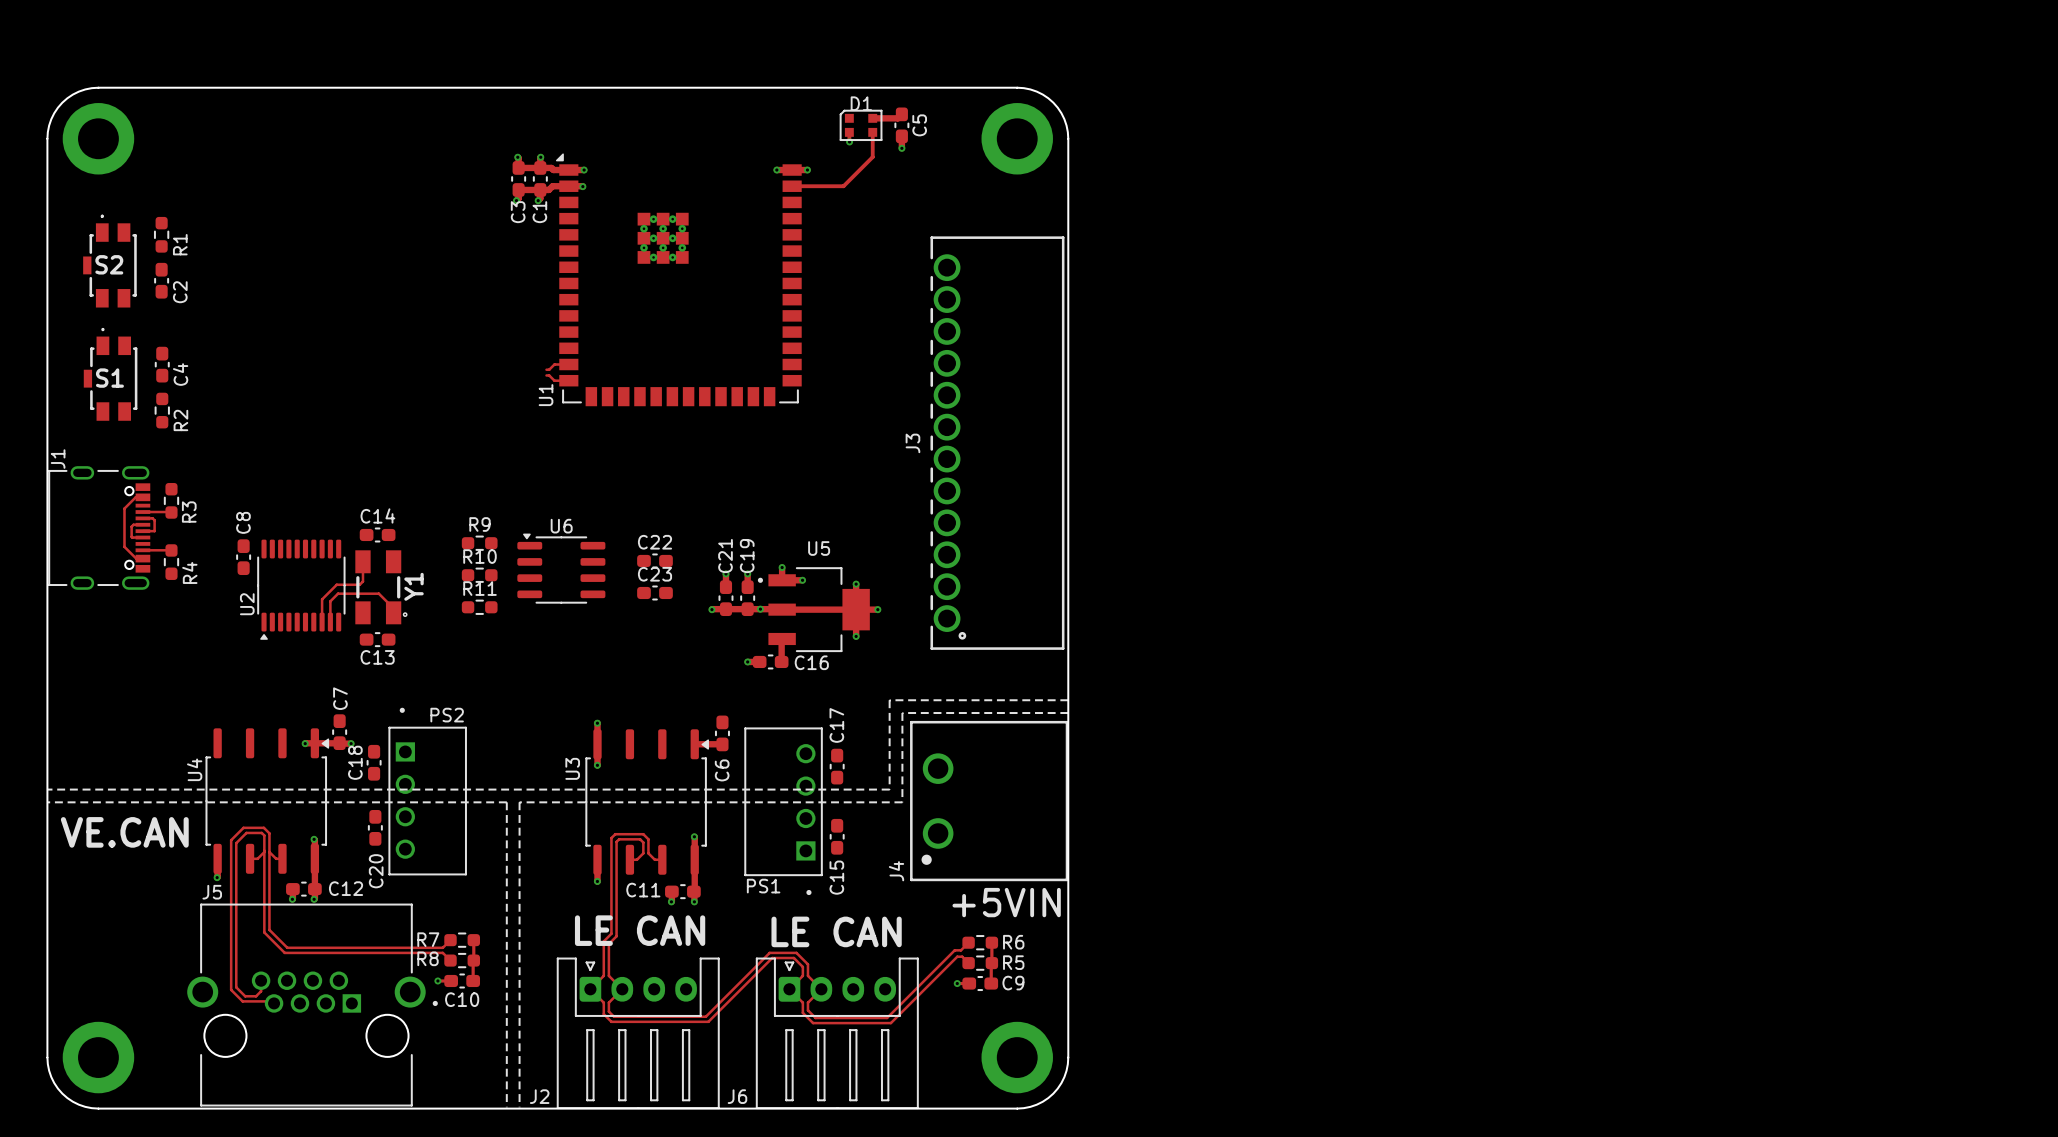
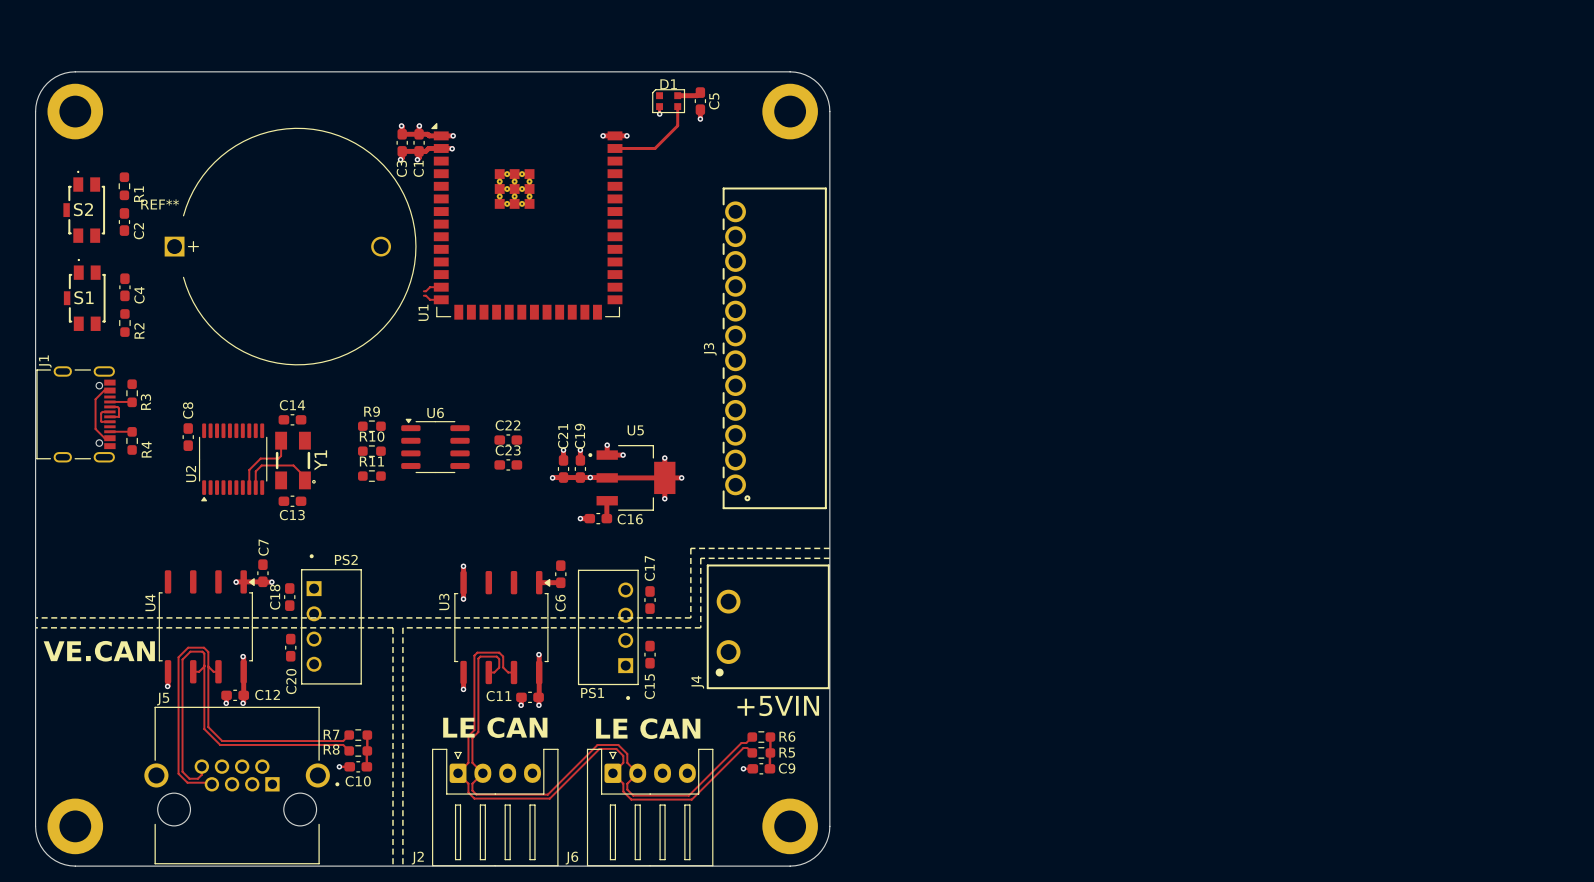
REF**: none -> (290, 246)

